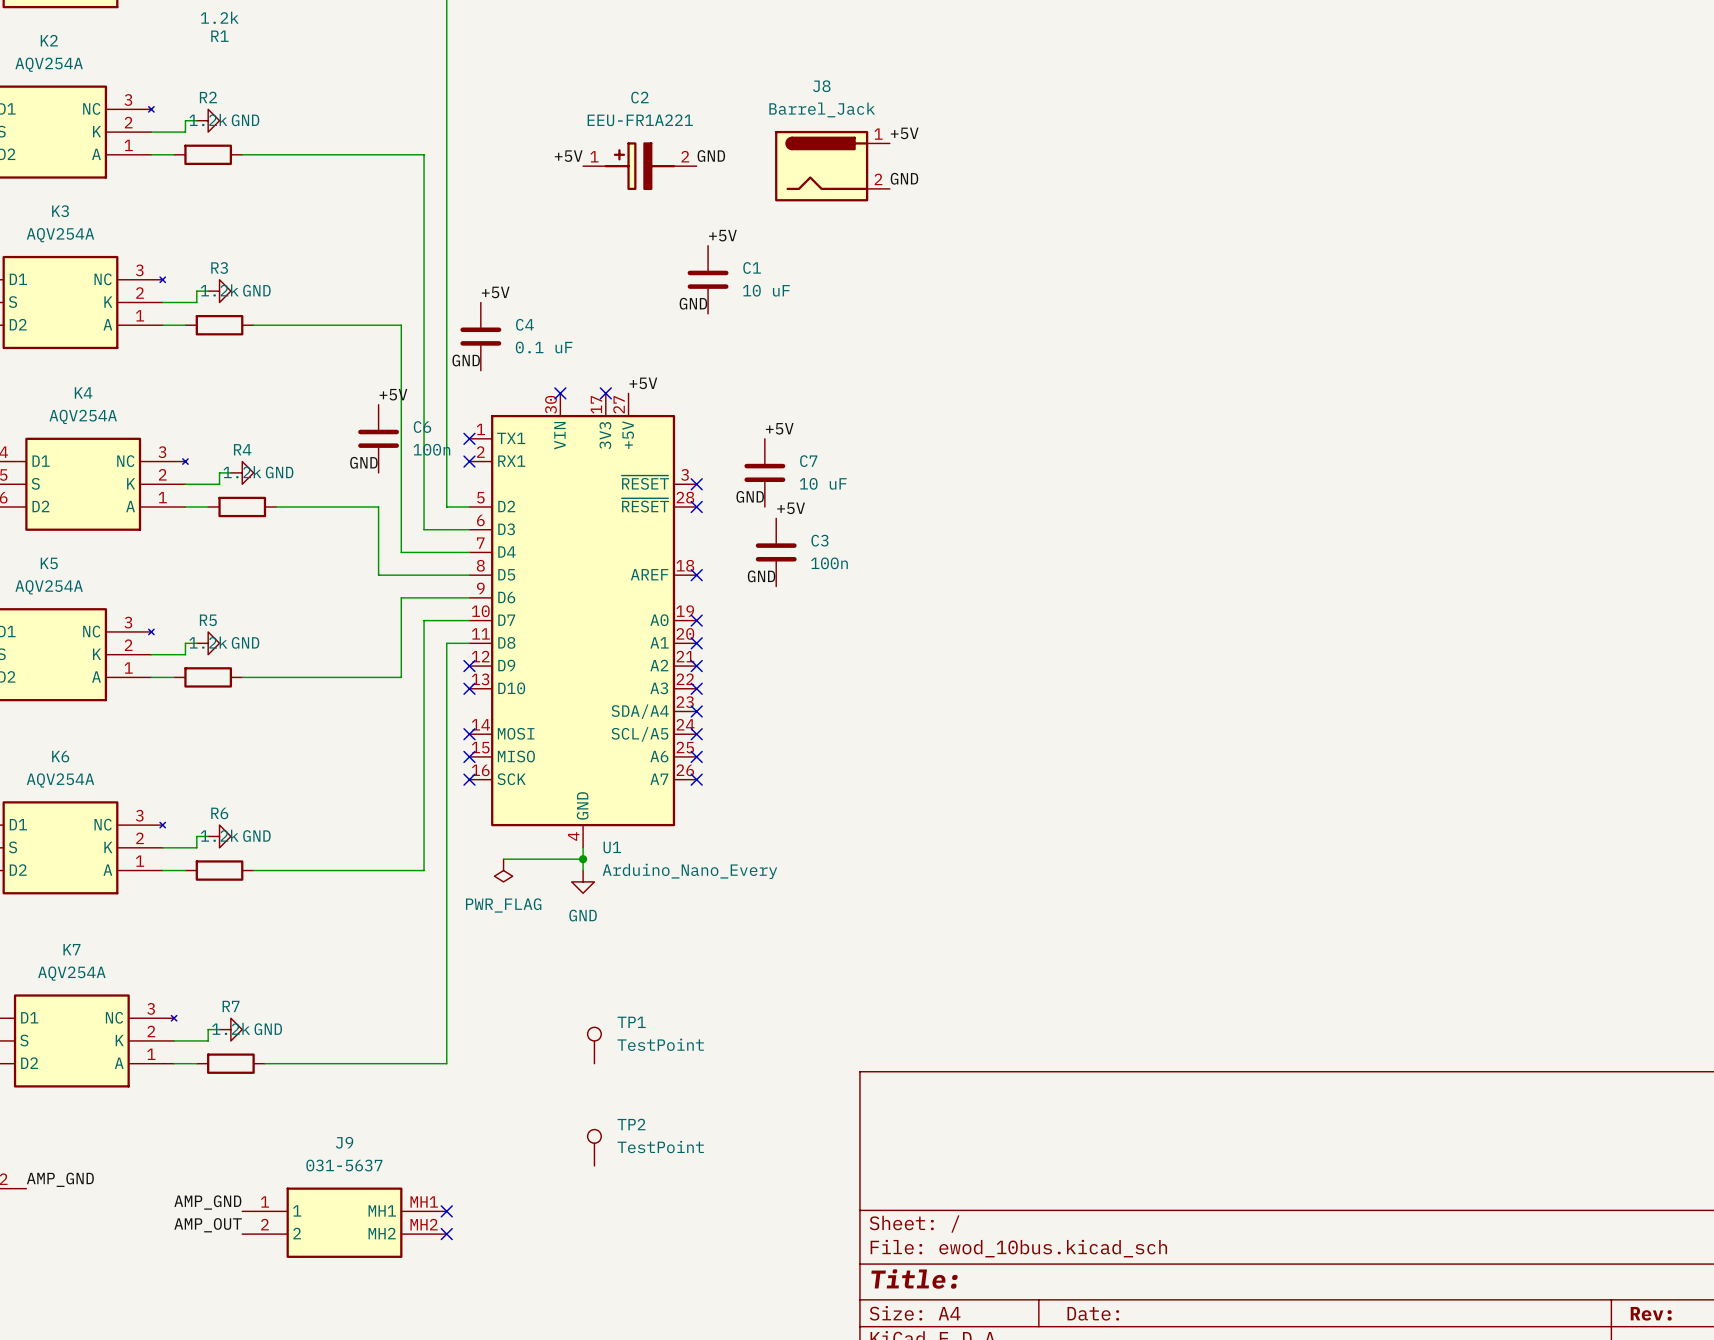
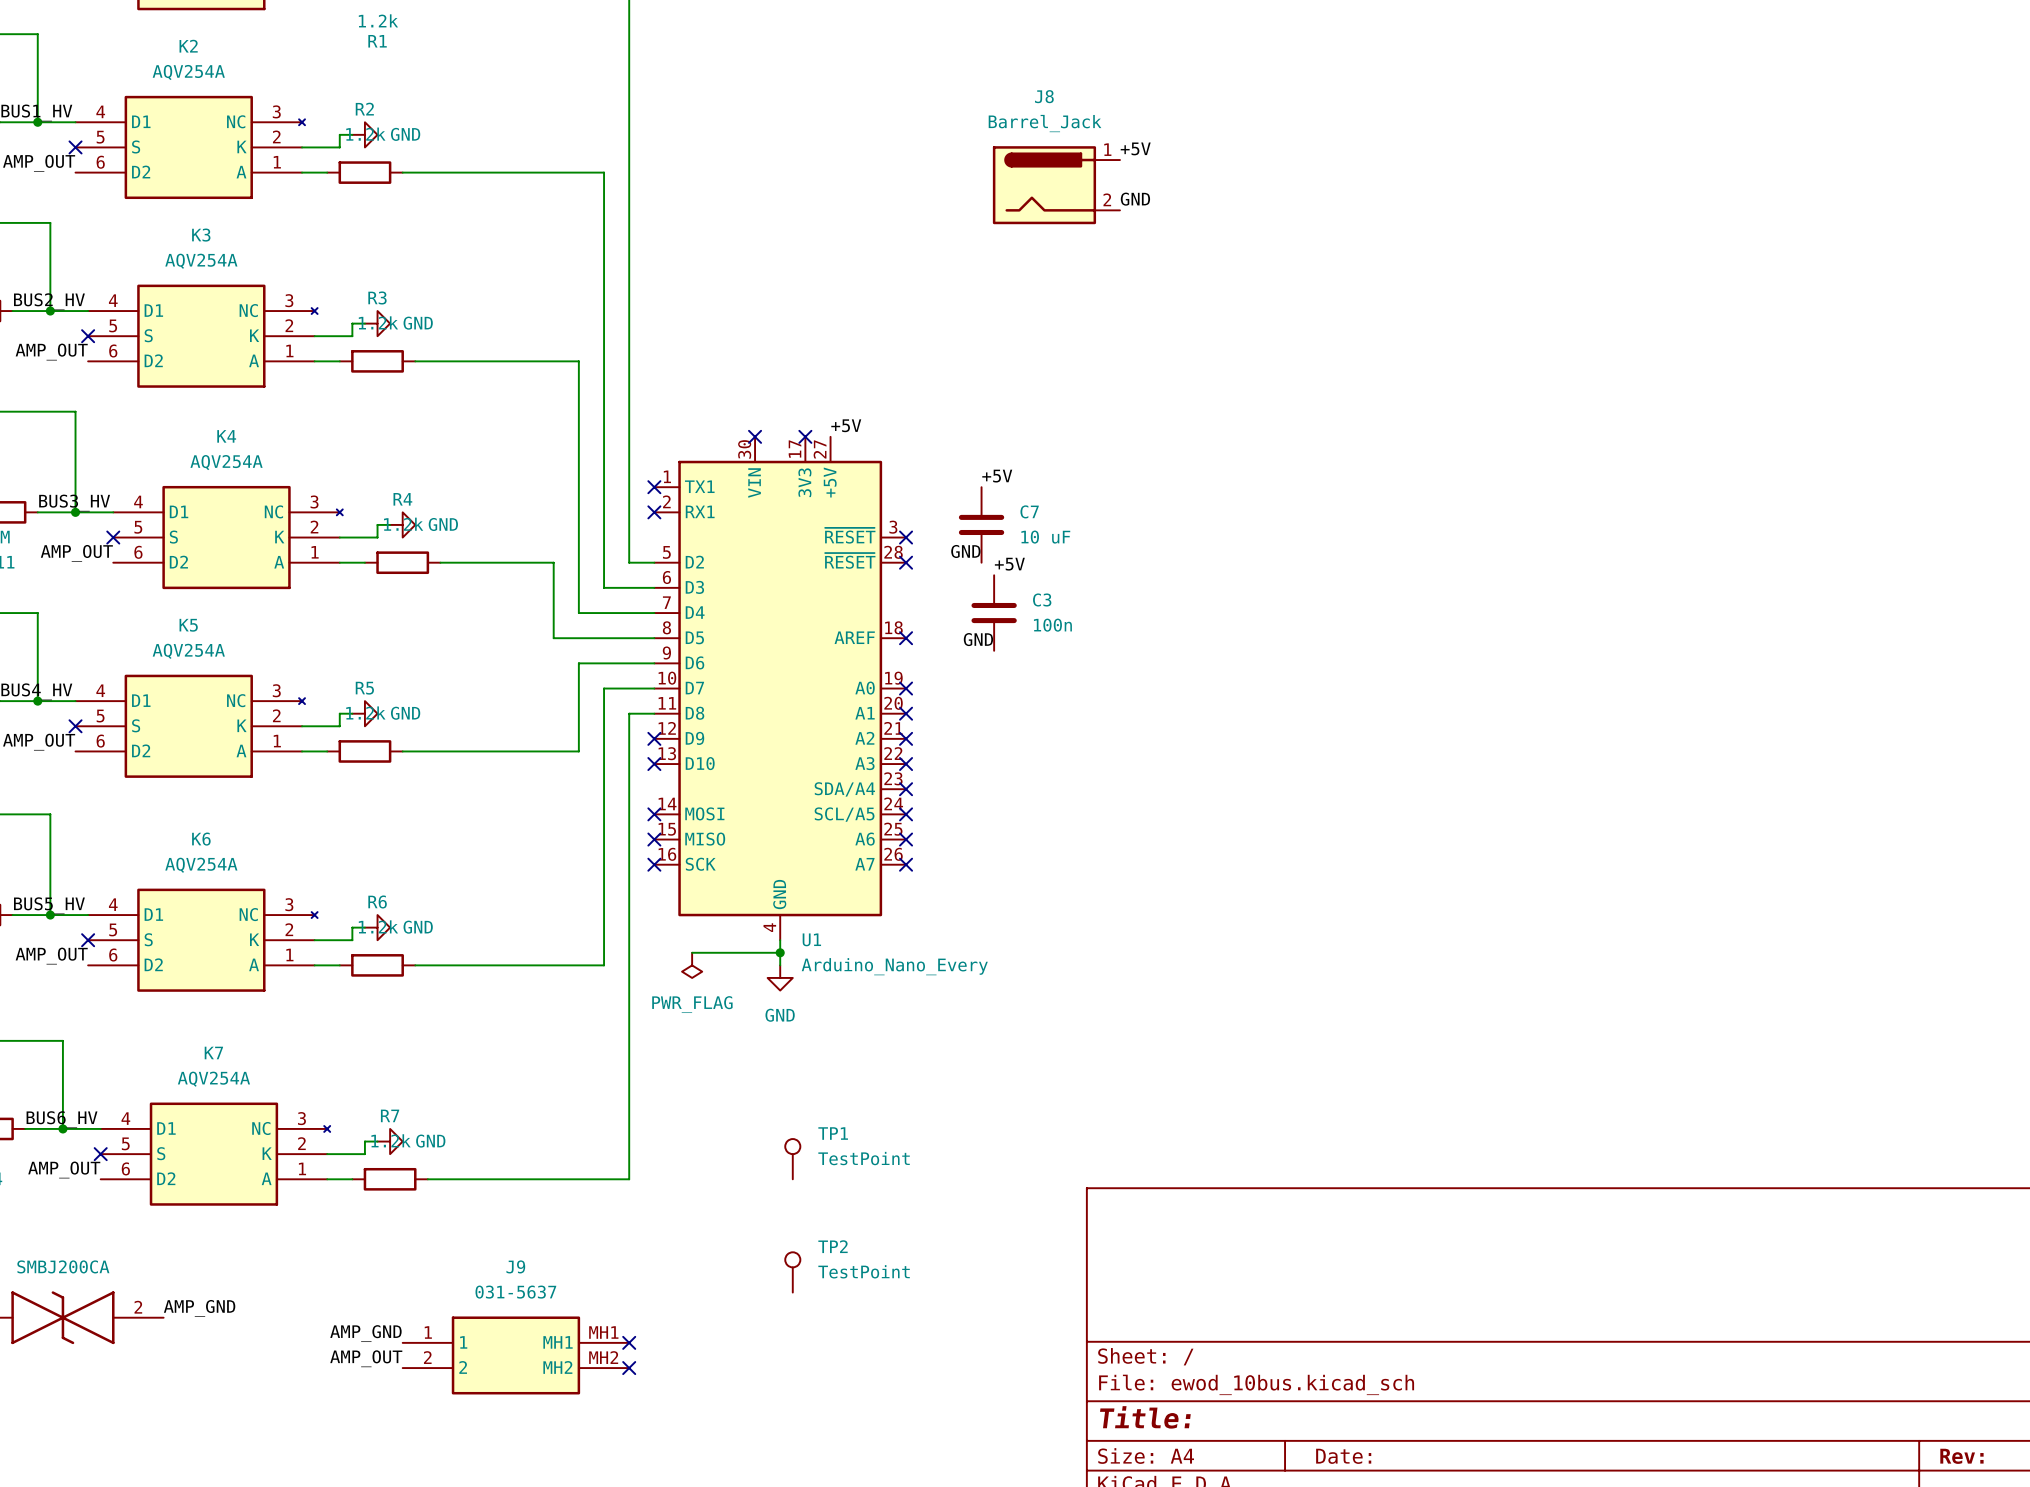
label: +5V (568, 156) -> none
label: GND (711, 156) -> none
C2: EEU-FR1A221 (639, 166) -> none
label: +5V (722, 235) -> none
C1: 10 uF (708, 279) -> none
label: +5V (495, 292) -> none
label: GND (693, 303) -> none
C4: 0.1 uF (480, 336) -> none
label: GND (466, 360) -> none
label: +5V (393, 394) -> none
C6: 100n (378, 438) -> none
label: GND (363, 462) -> none

